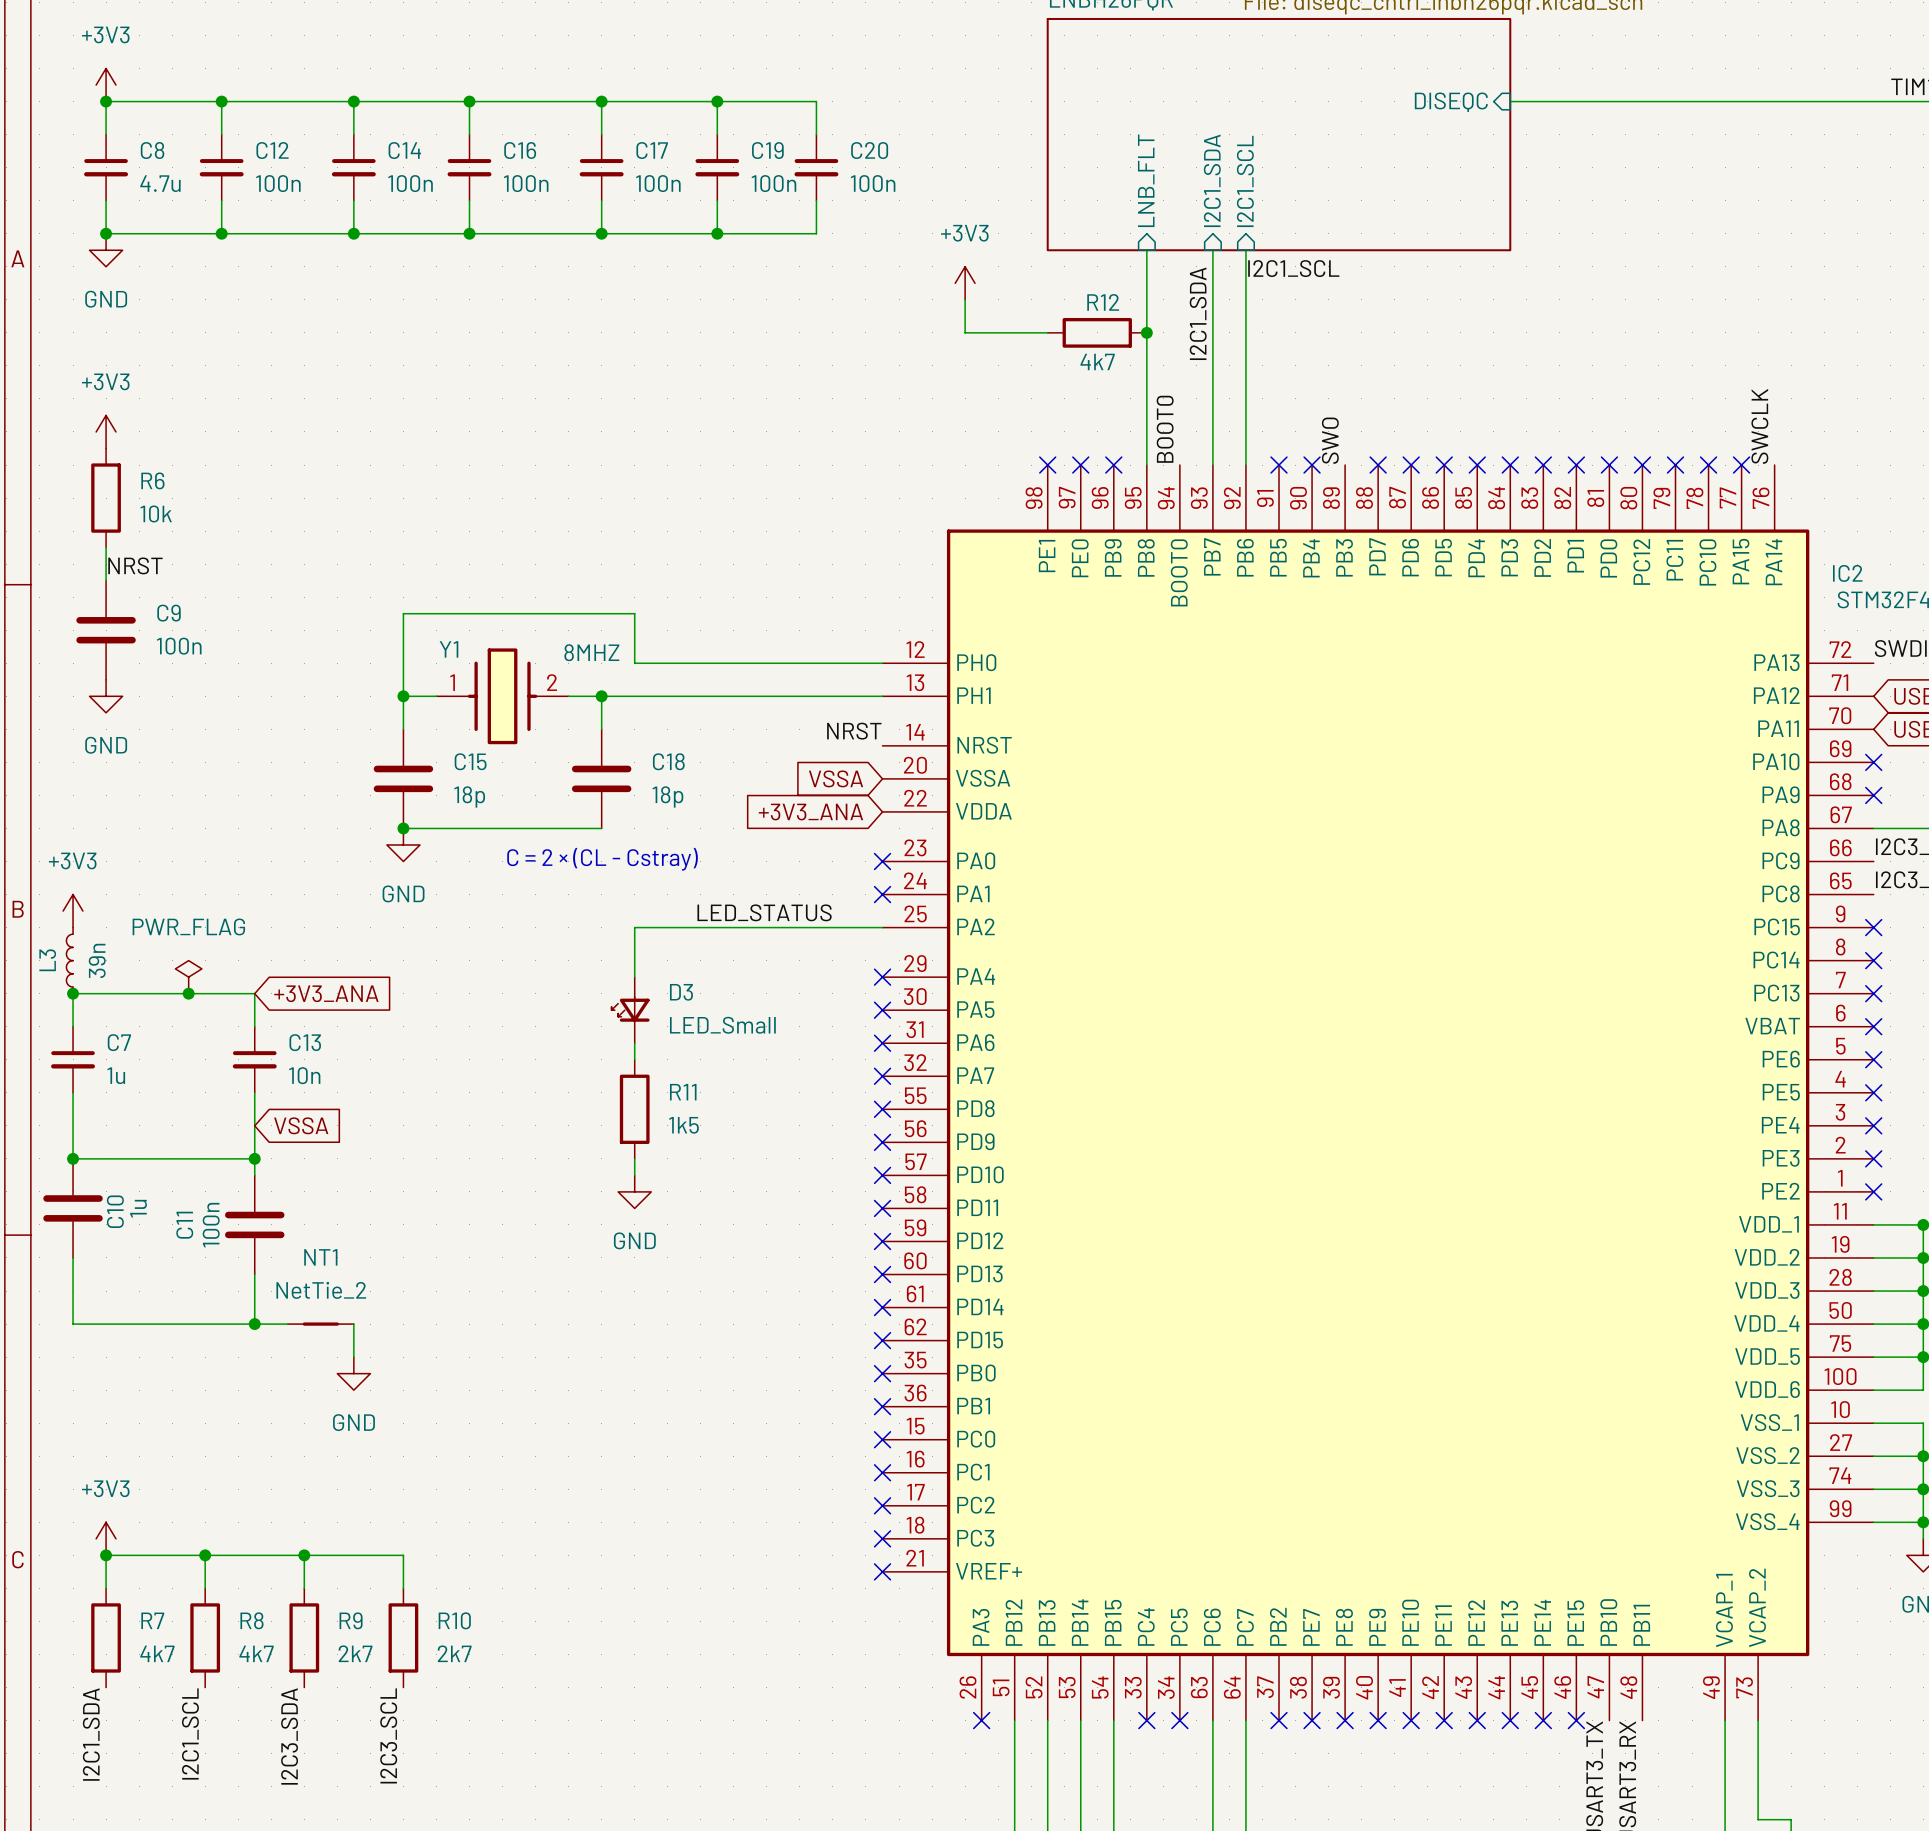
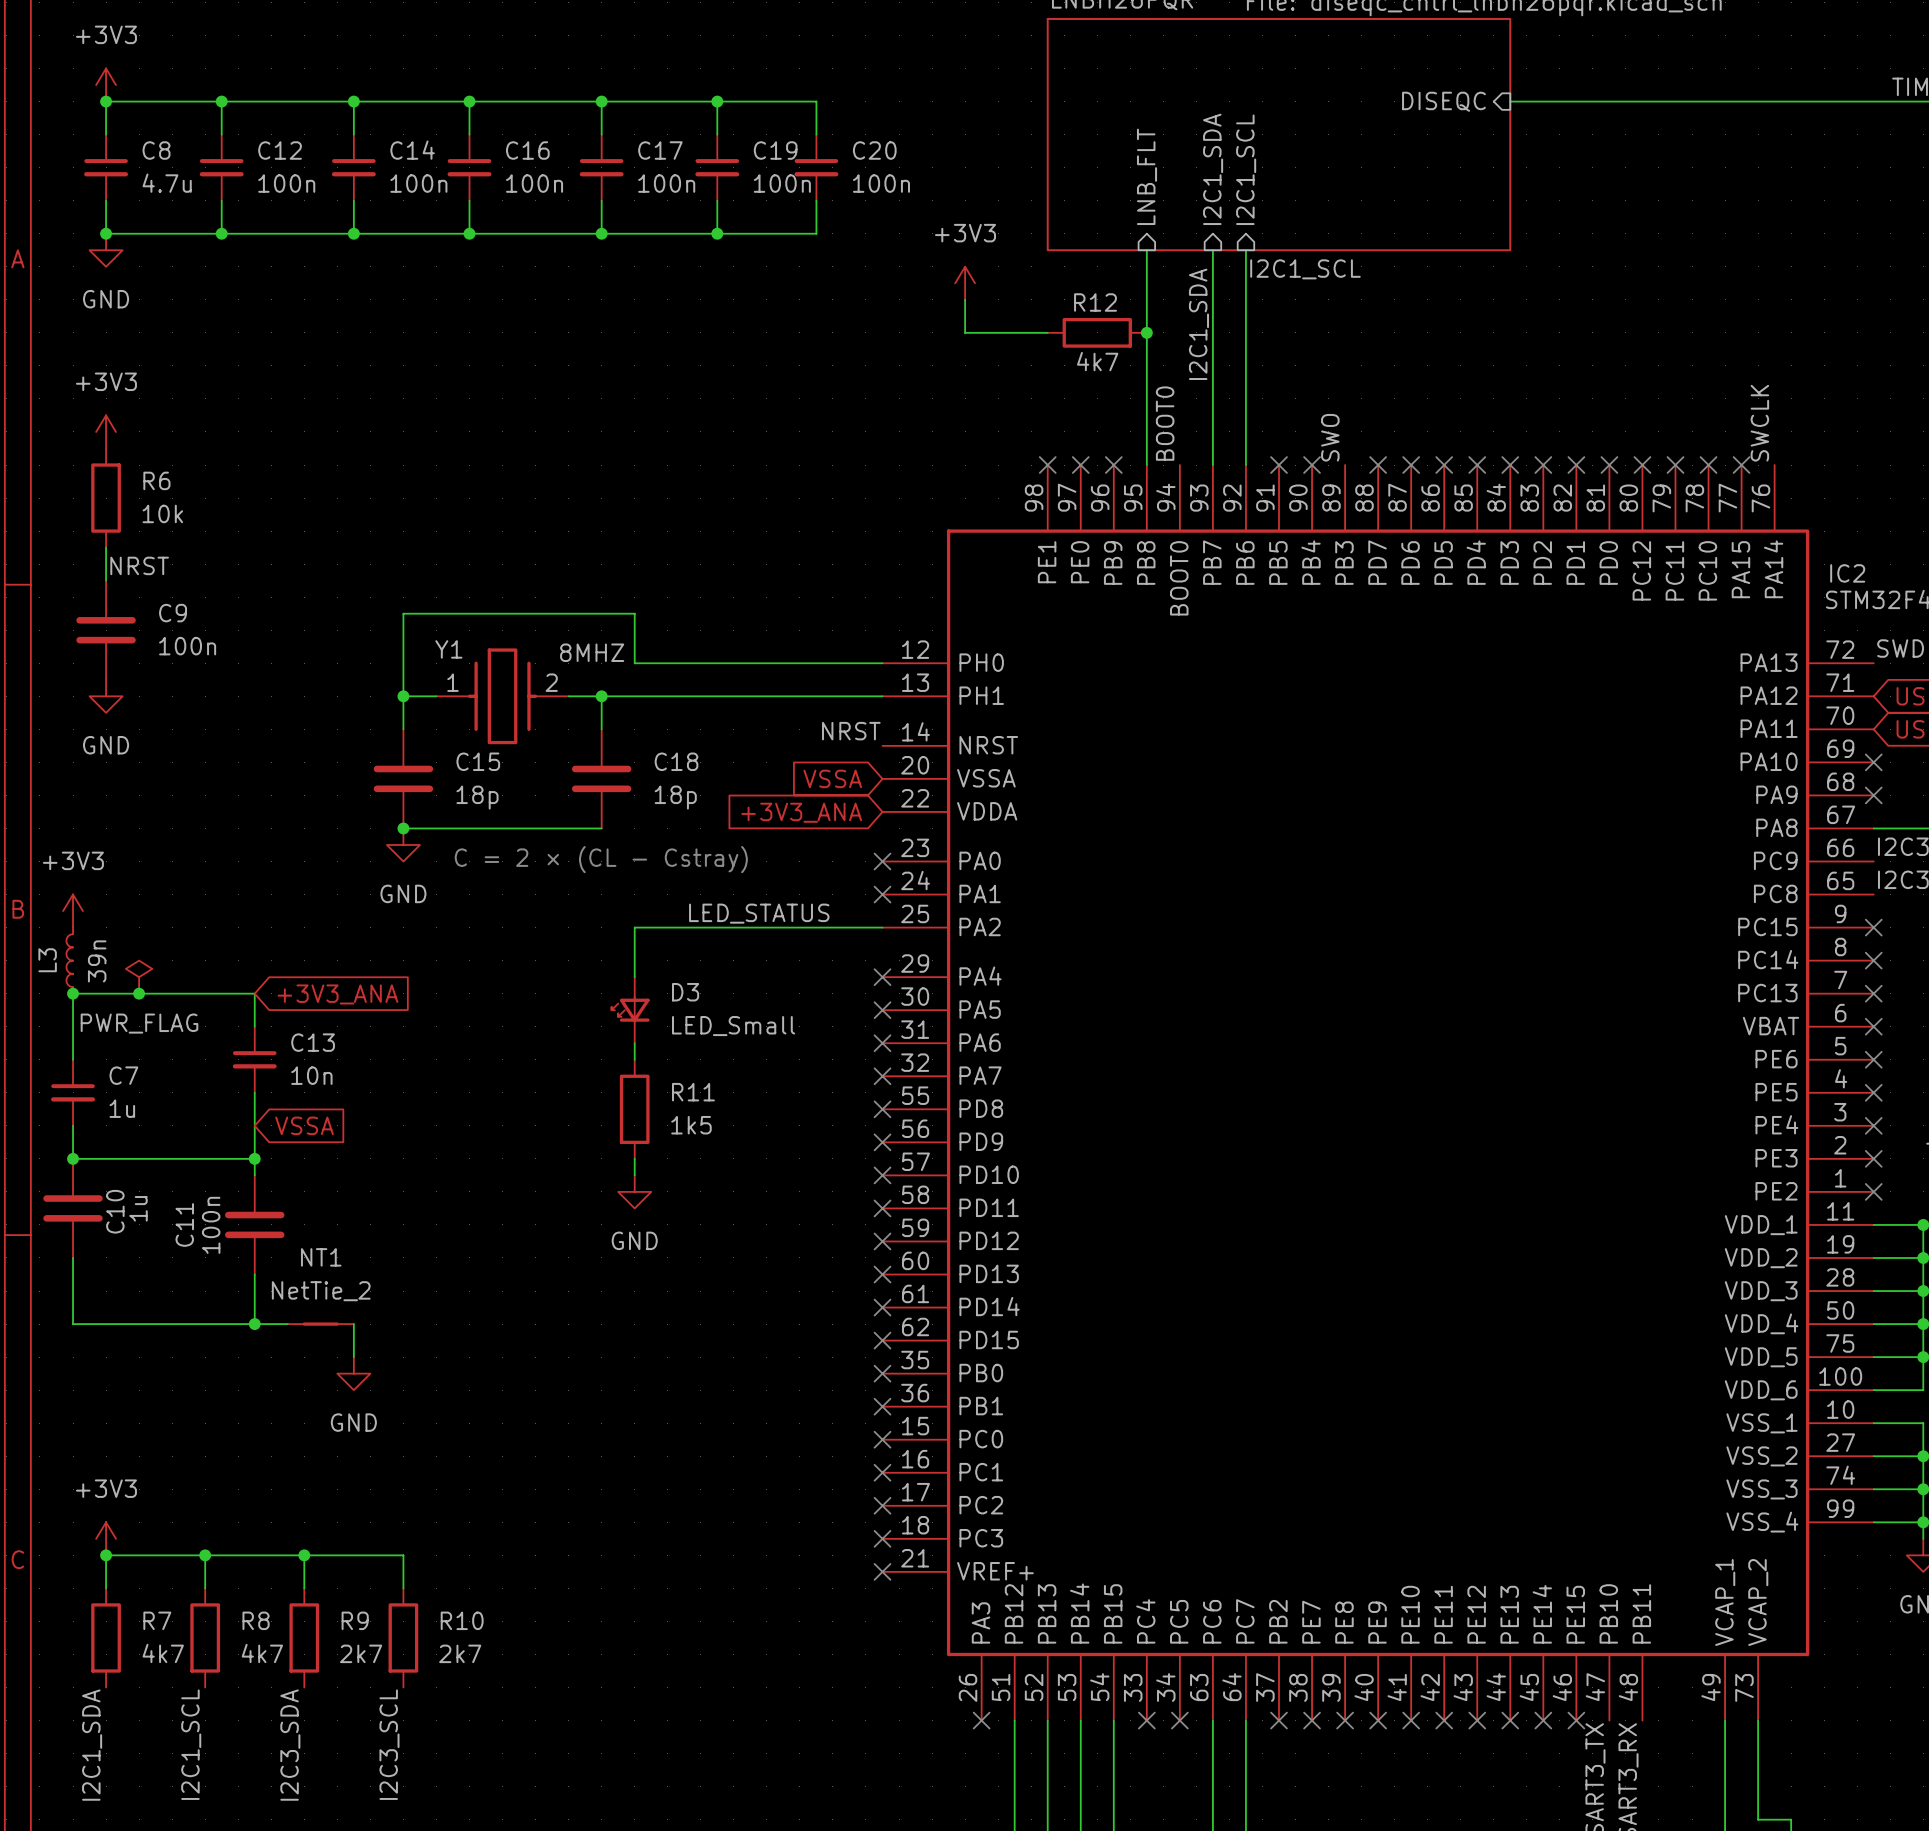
power symbol text position: PWR_FLAG (188, 926) -> PWR_FLAG (139, 1023)
power symbol position: PWR_FLAG (188, 977) -> PWR_FLAG (139, 977)
junction position: (188, 993) -> (139, 993)
C7 position: (73, 1059) -> (73, 1092)

